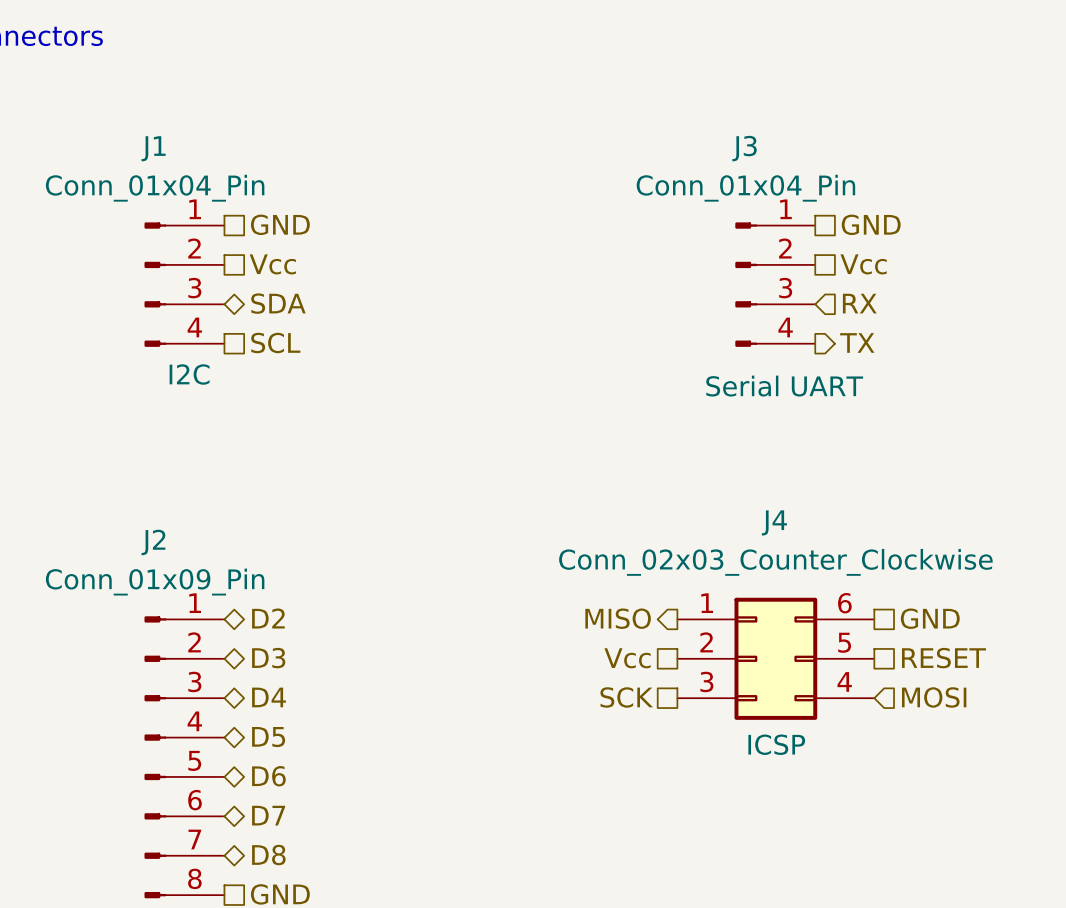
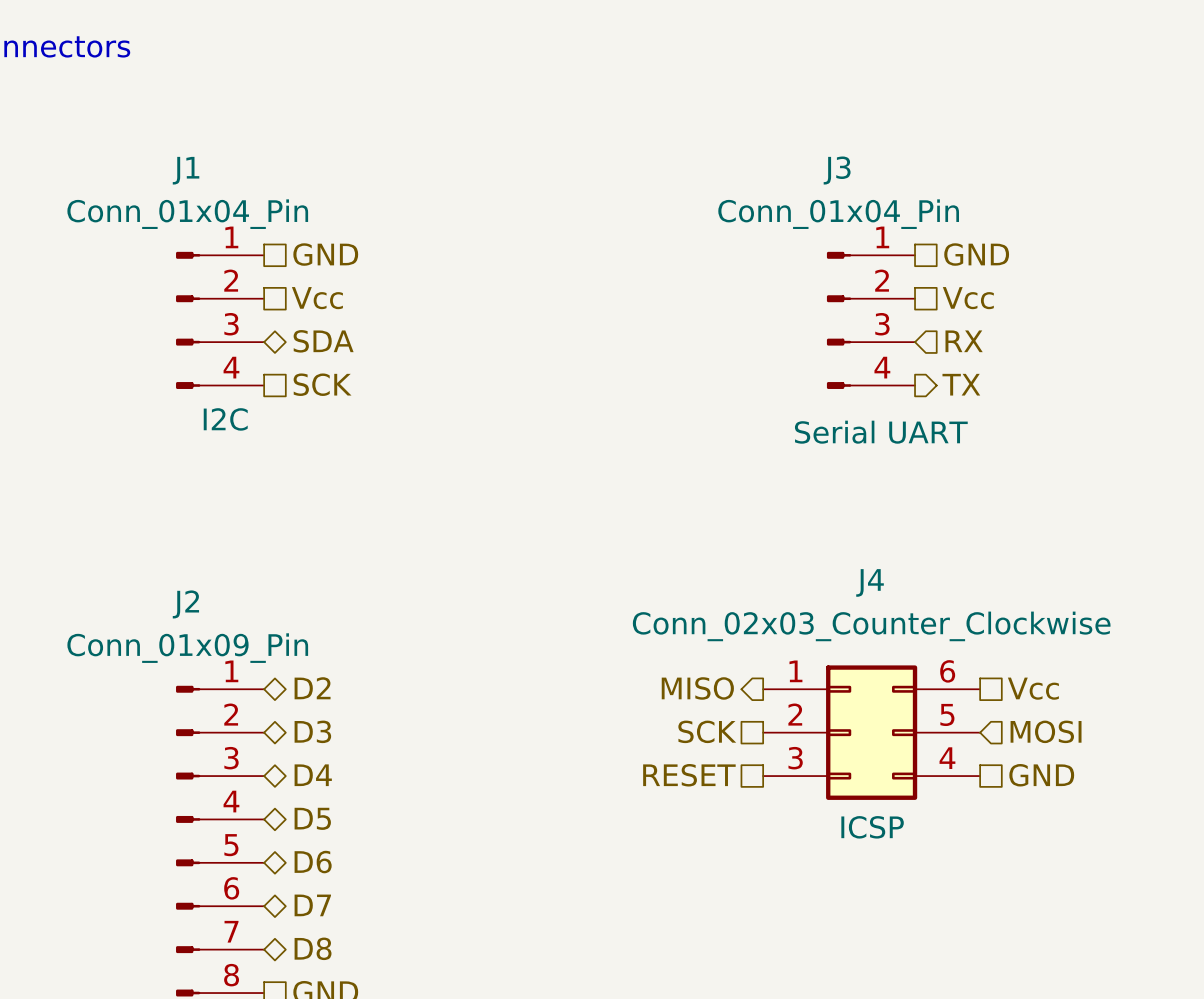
hierarchical label: SCL (275, 342) -> SCK (322, 384)
hierarchical label: GND (930, 618) -> Vcc (1033, 688)
hierarchical label: Vcc (627, 658) -> SCK (707, 731)
hierarchical label shape: passive (943, 658) -> input (1046, 731)
hierarchical label: RESET (943, 658) -> MOSI (1046, 731)
hierarchical label: SCK (626, 697) -> RESET (689, 775)
hierarchical label shape: input (934, 697) -> passive (1041, 775)
hierarchical label: MOSI (934, 697) -> GND (1041, 775)

